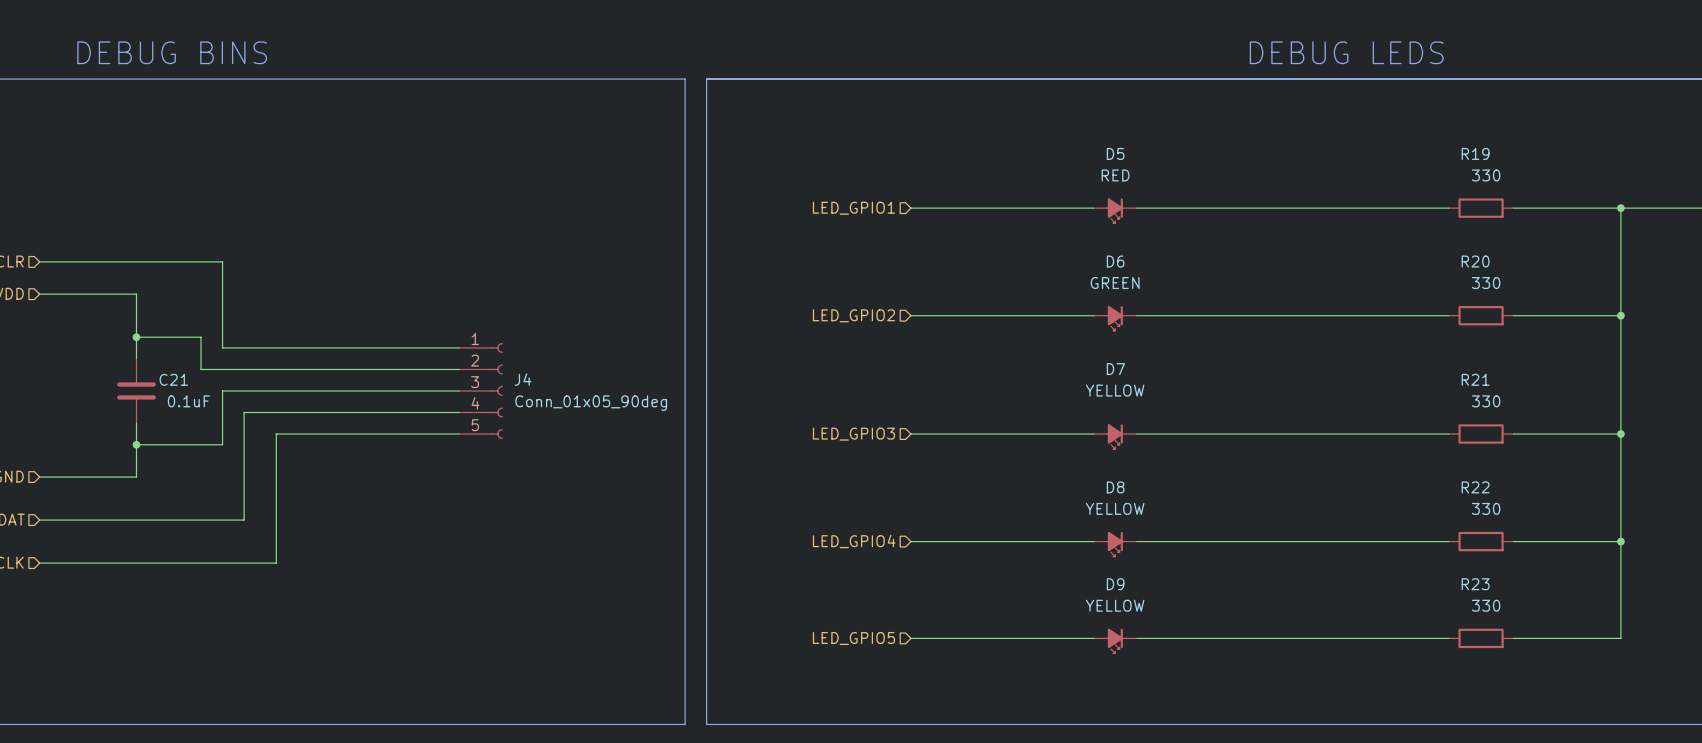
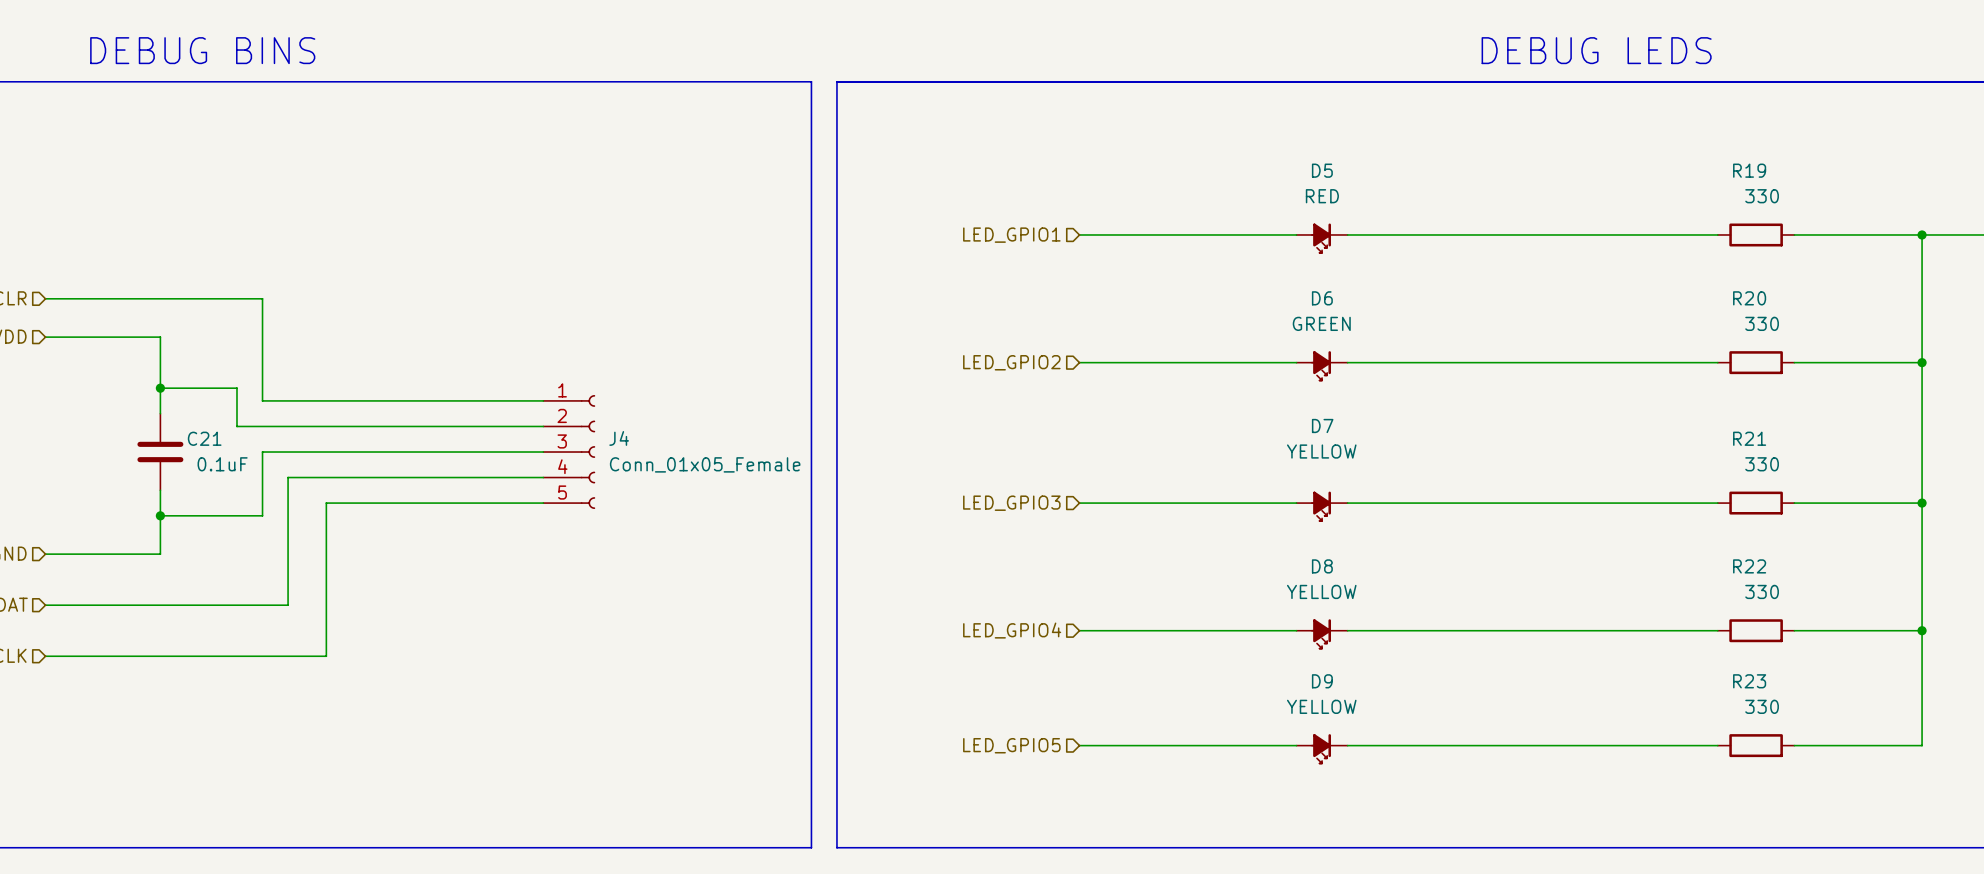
J4 value: Conn_01x05_90deg (591, 403) -> Conn_01x05_Female (705, 464)

